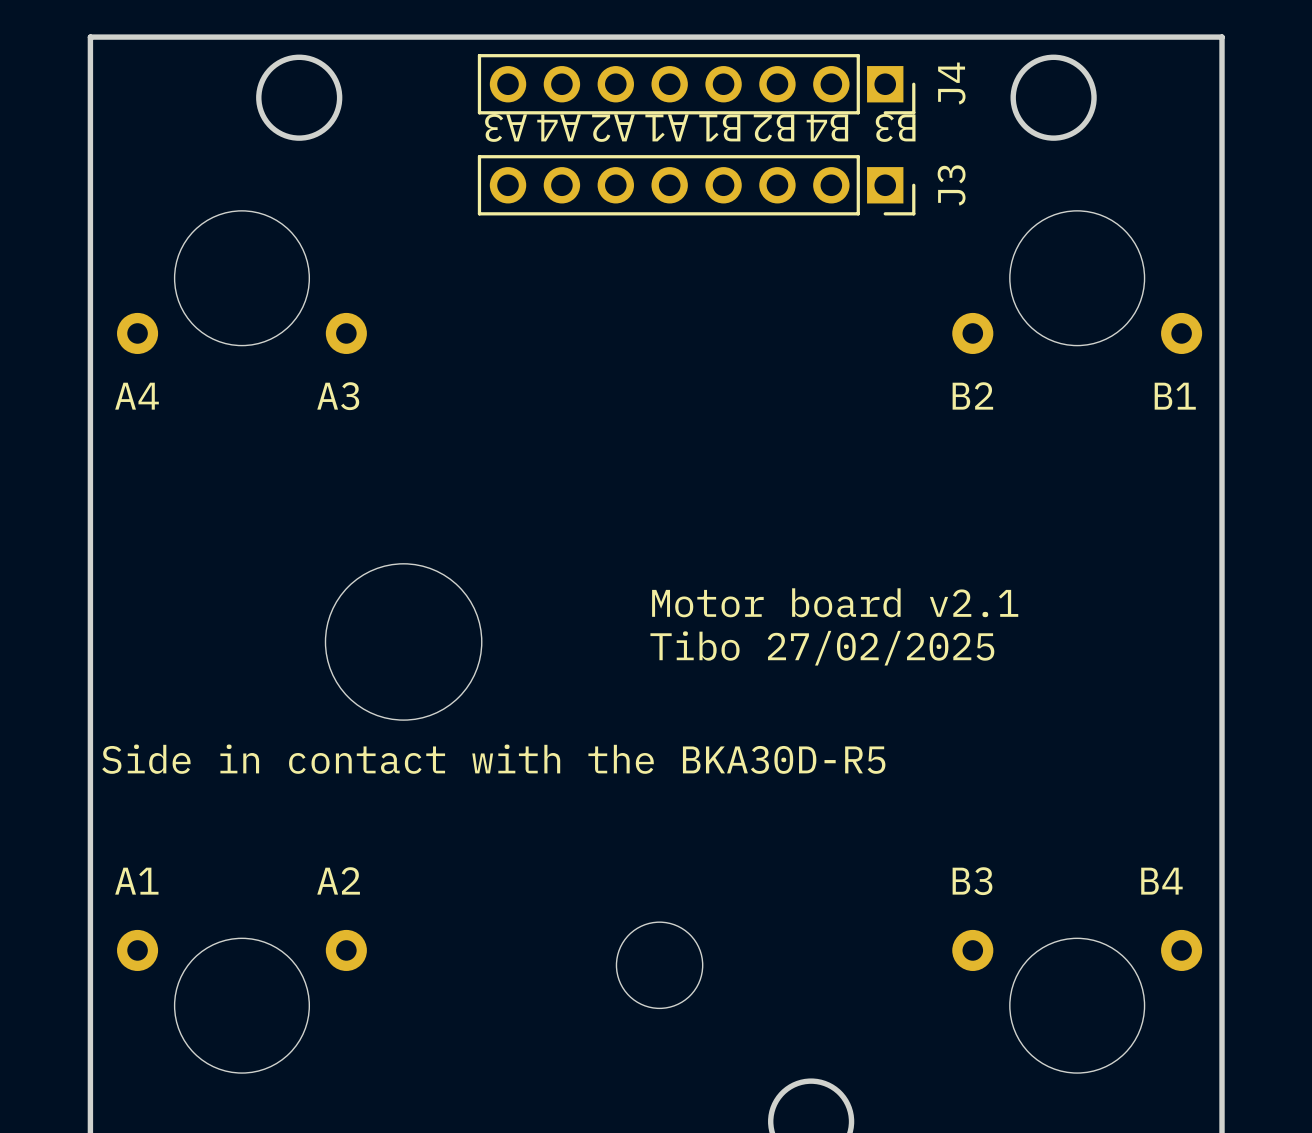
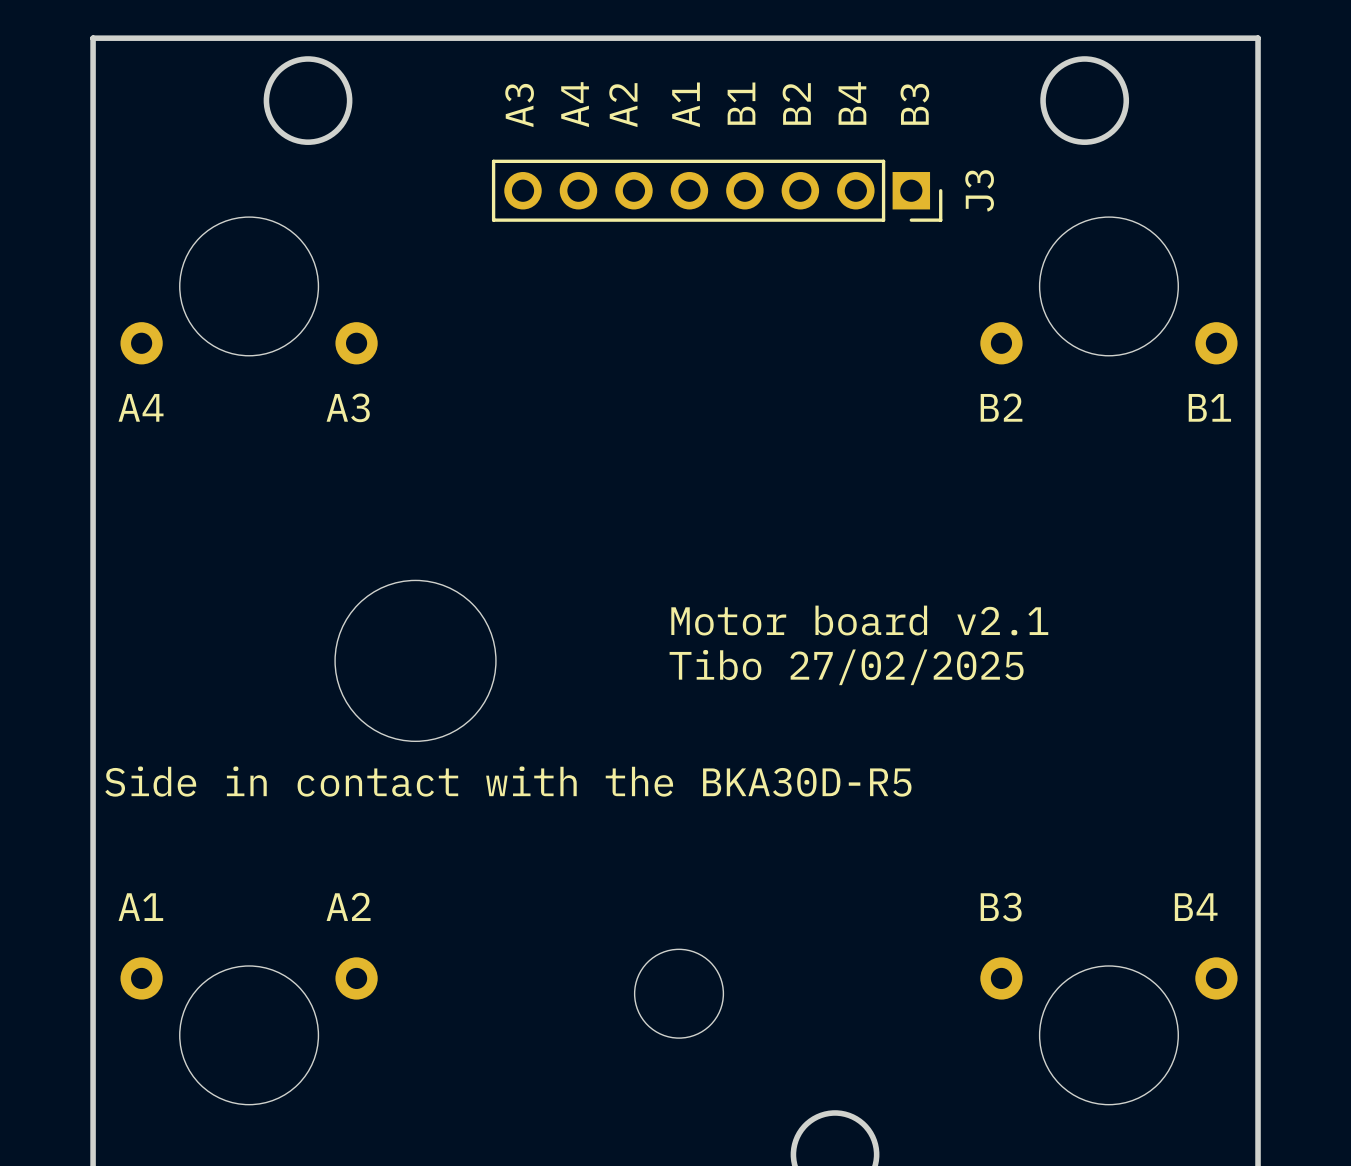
J4: (696, 84) -> none
text rotation: 0° (506, 127) -> 90° clockwise (519, 105)
text rotation: 0° (559, 127) -> 90° clockwise (575, 104)
text rotation: 0° (667, 127) -> 90° clockwise (686, 104)
text rotation: 0° (719, 127) -> 90° clockwise (741, 103)
text rotation: 0° (827, 127) -> 90° clockwise (852, 103)
text rotation: 0° (895, 127) -> 90° clockwise (914, 104)
text rotation: 0° (613, 128) -> 90° clockwise (623, 105)
text rotation: 0° (774, 128) -> 90° clockwise (796, 103)

